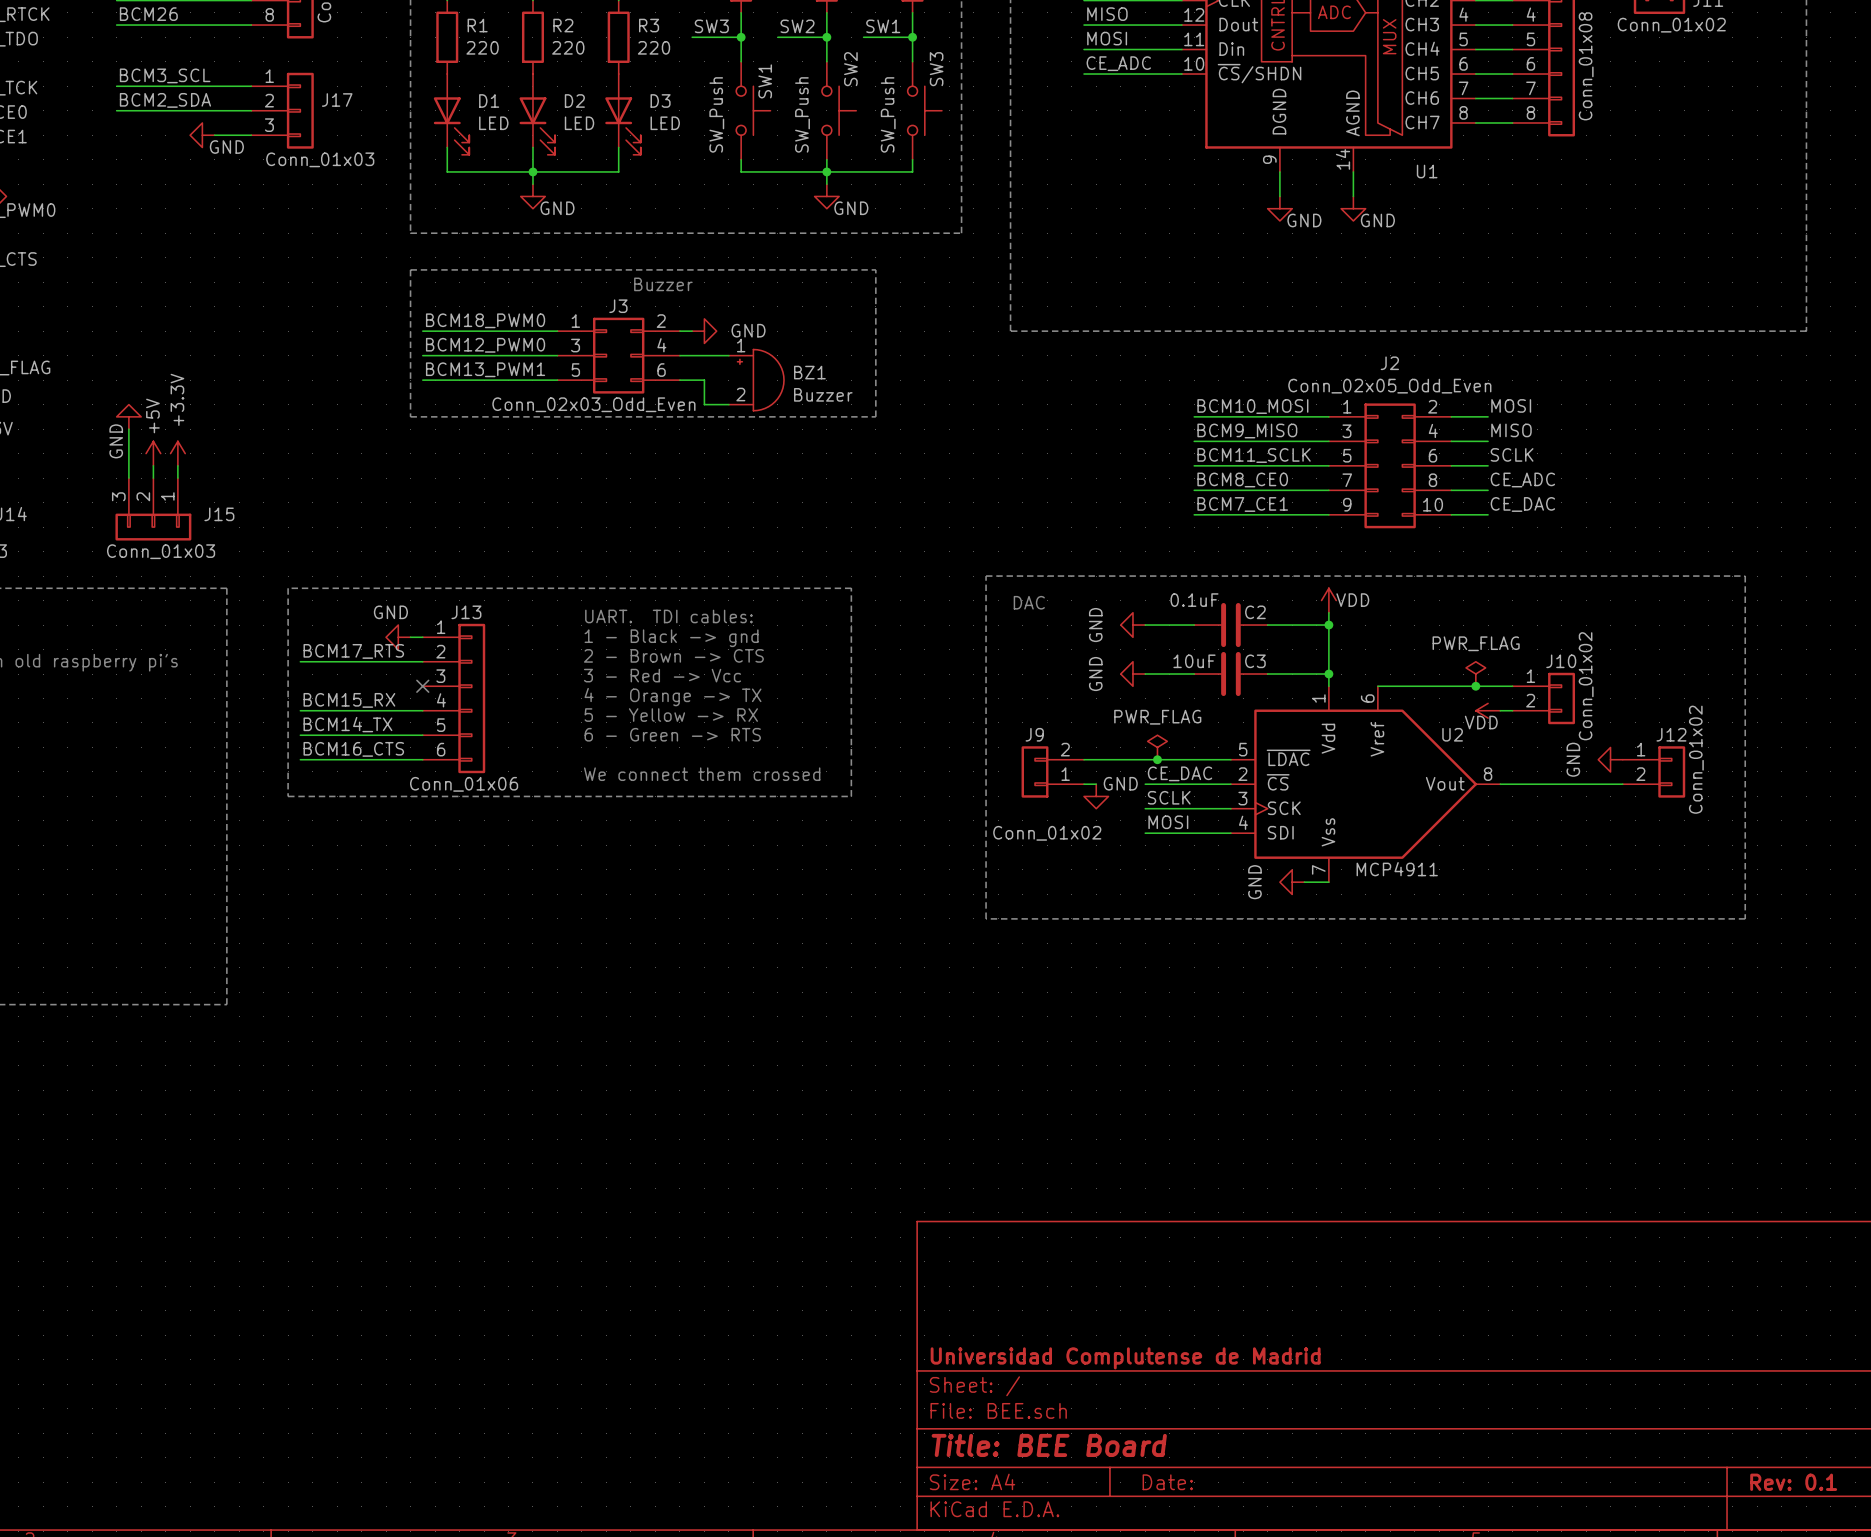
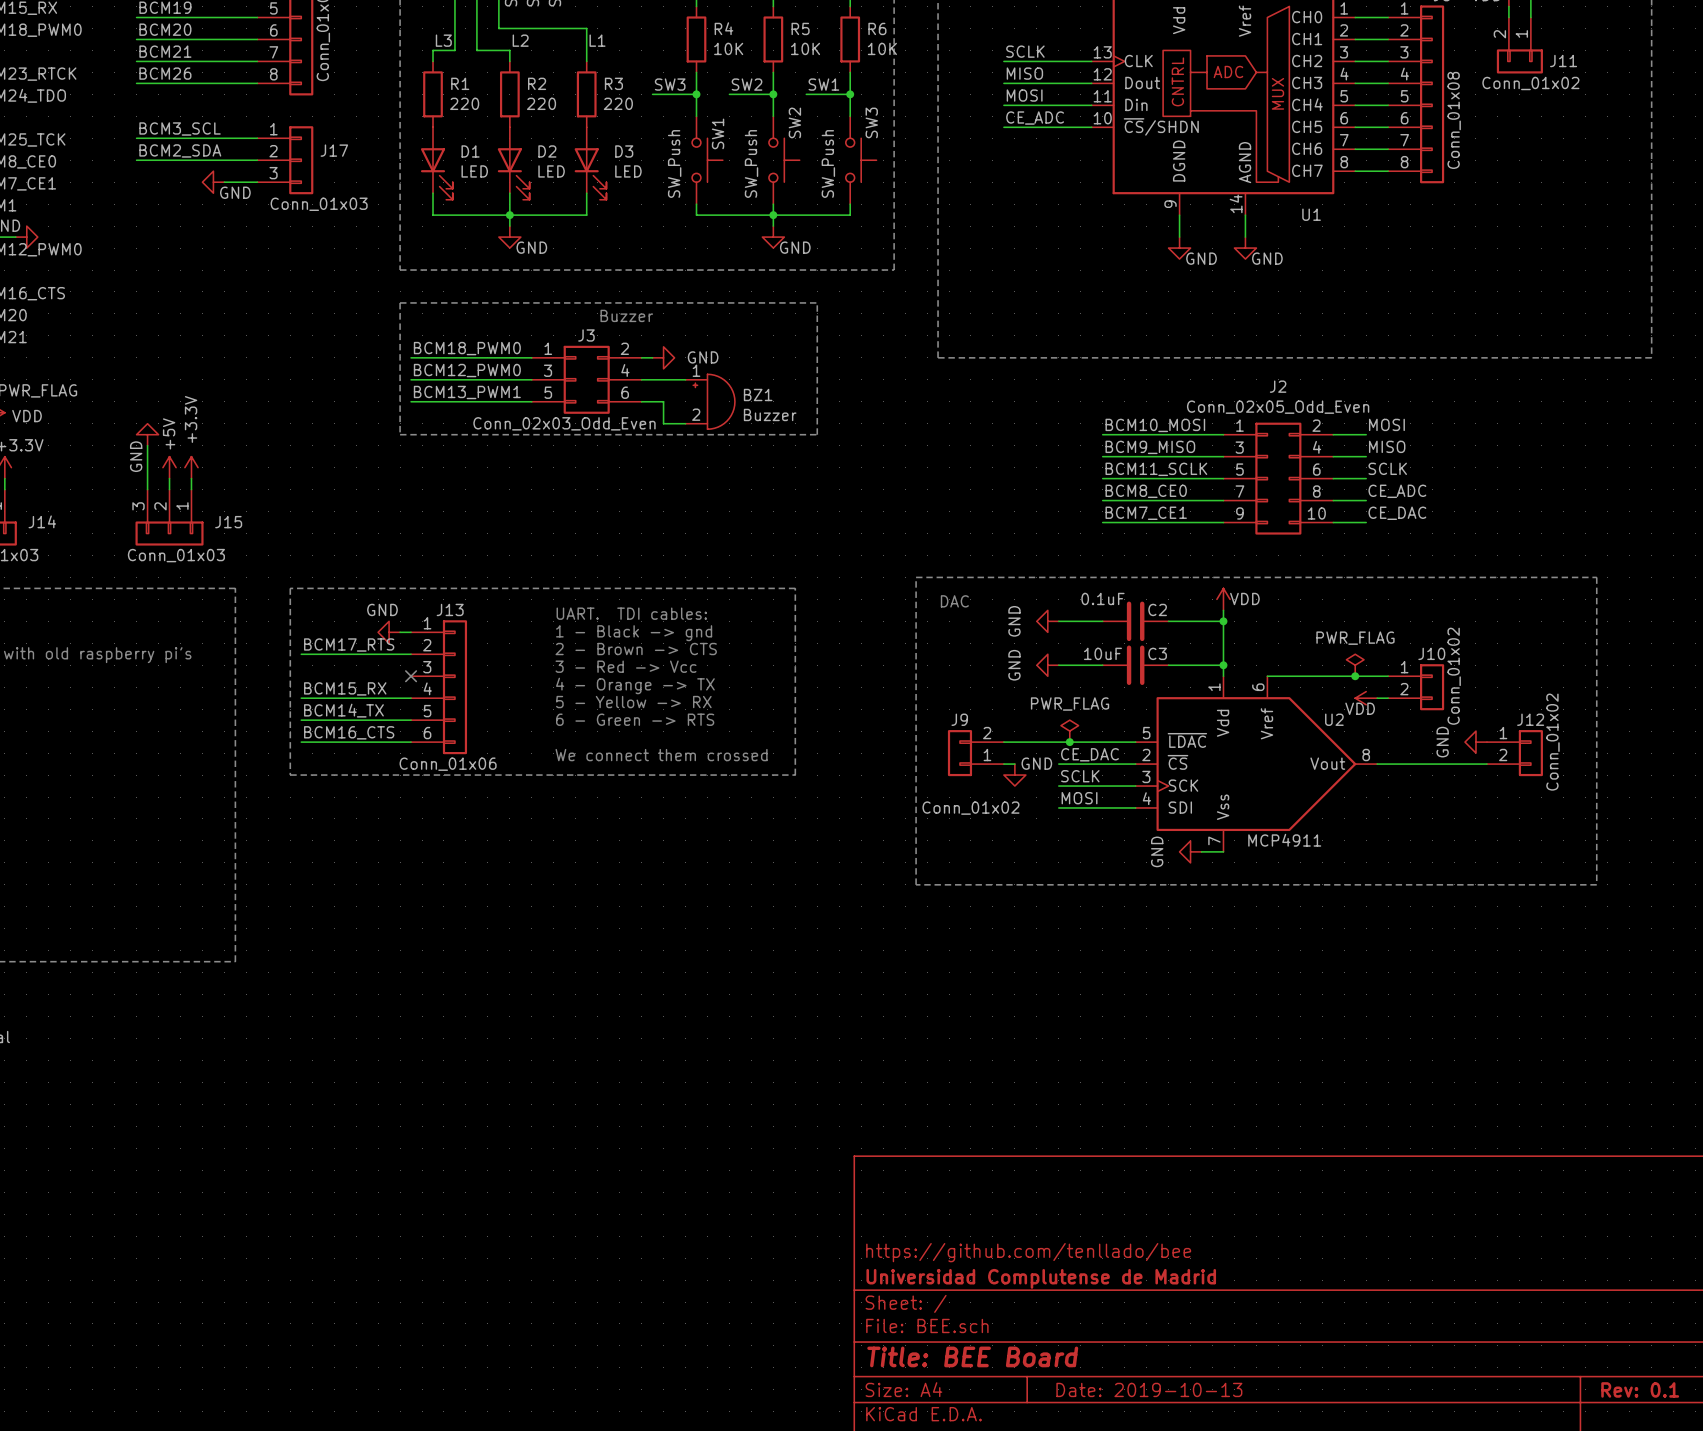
title block: none -> https://github.com/tenllado/bee (1028, 1252)
title block: Date: (1167, 1482) -> Date: 2019-10-13 (1149, 1389)

